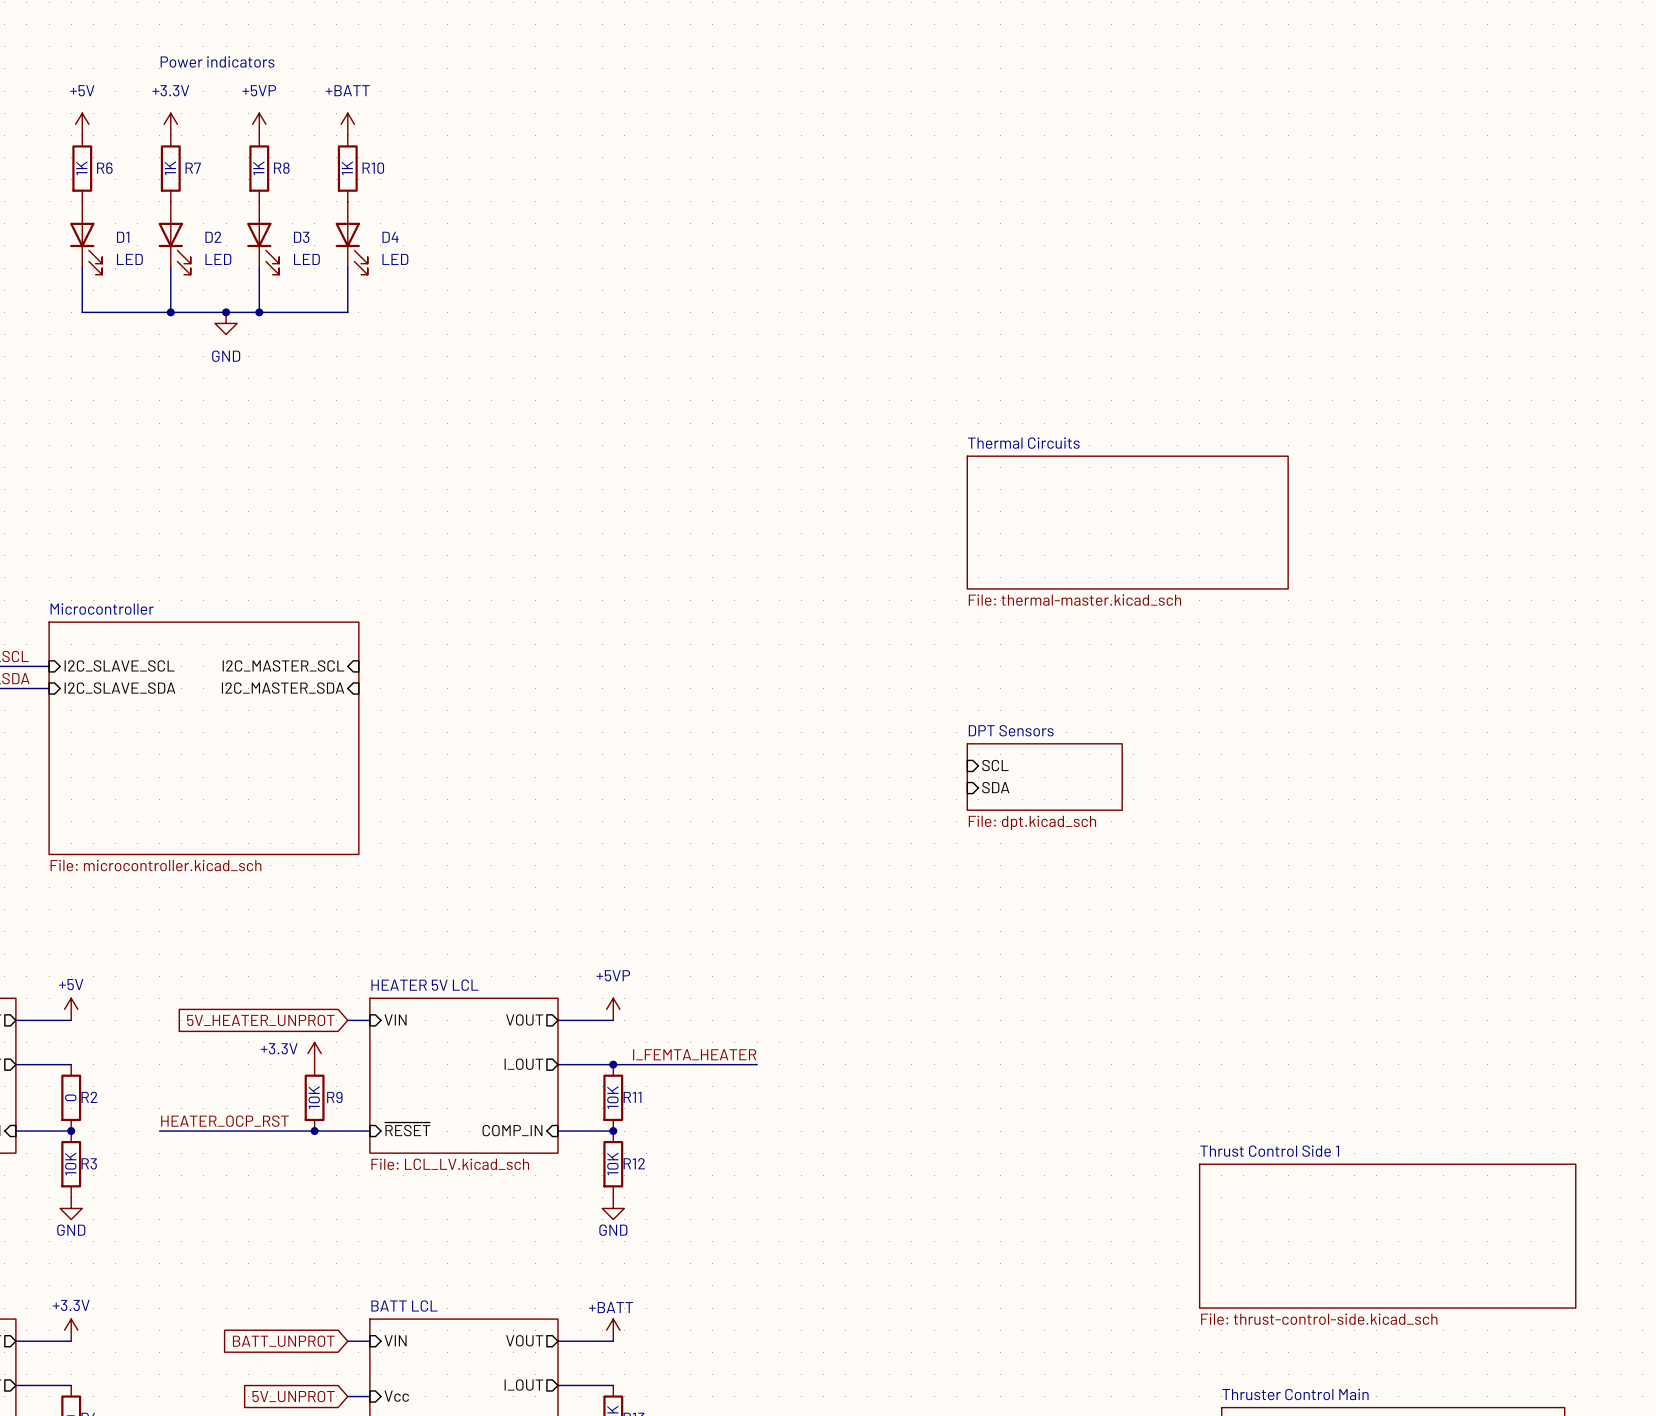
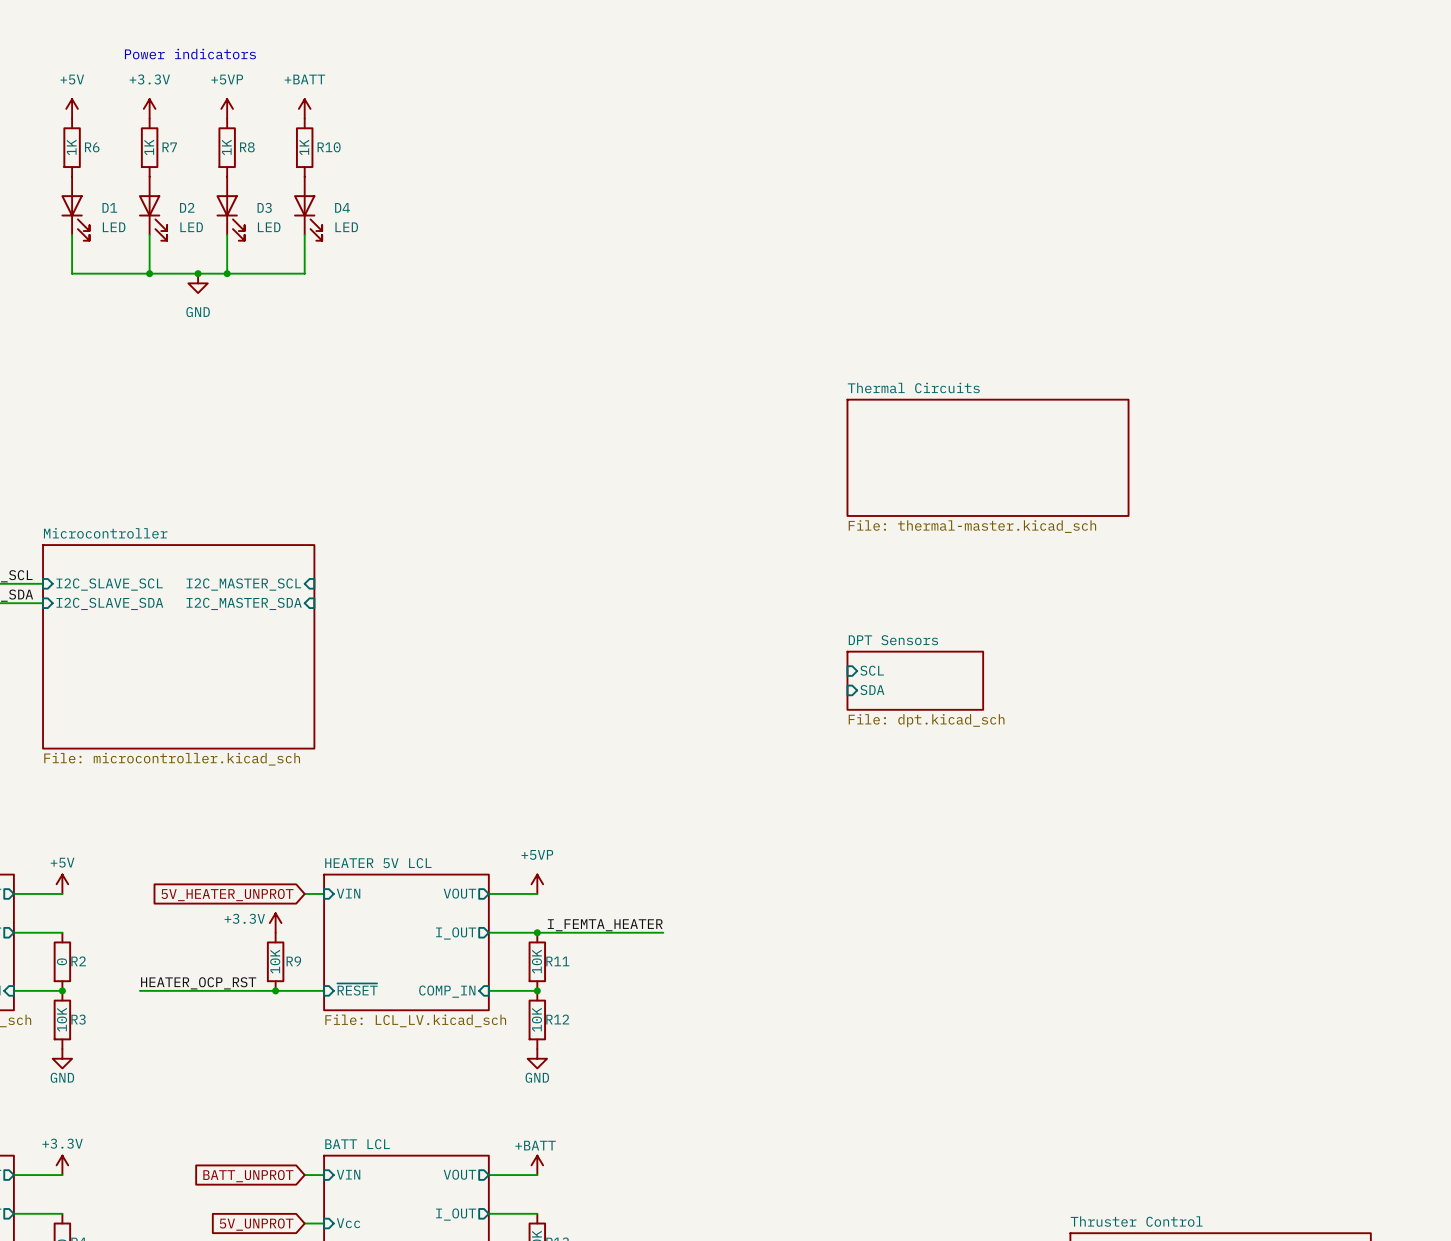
sheet Thrust Control Side 1: File: thrust-control-side.kicad_sch (1387, 1236) -> none
sheet Thruster Control Main name: Thruster Control Main (1295, 1394) -> Thruster Control (1136, 1221)

